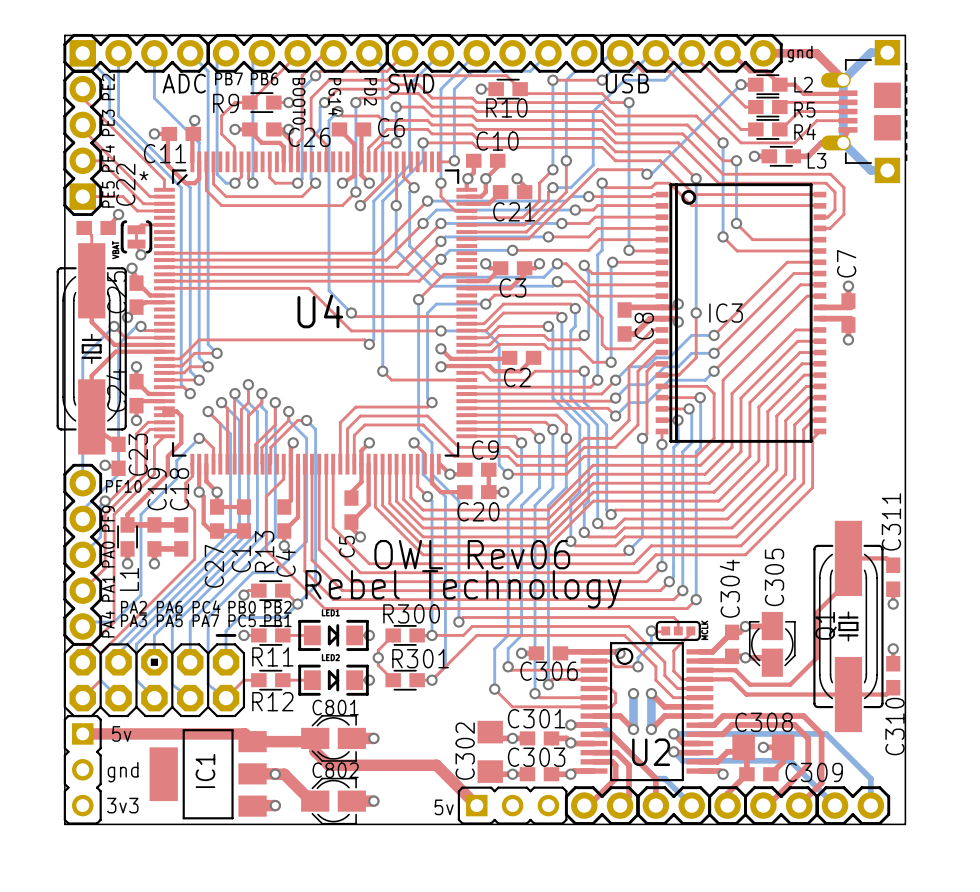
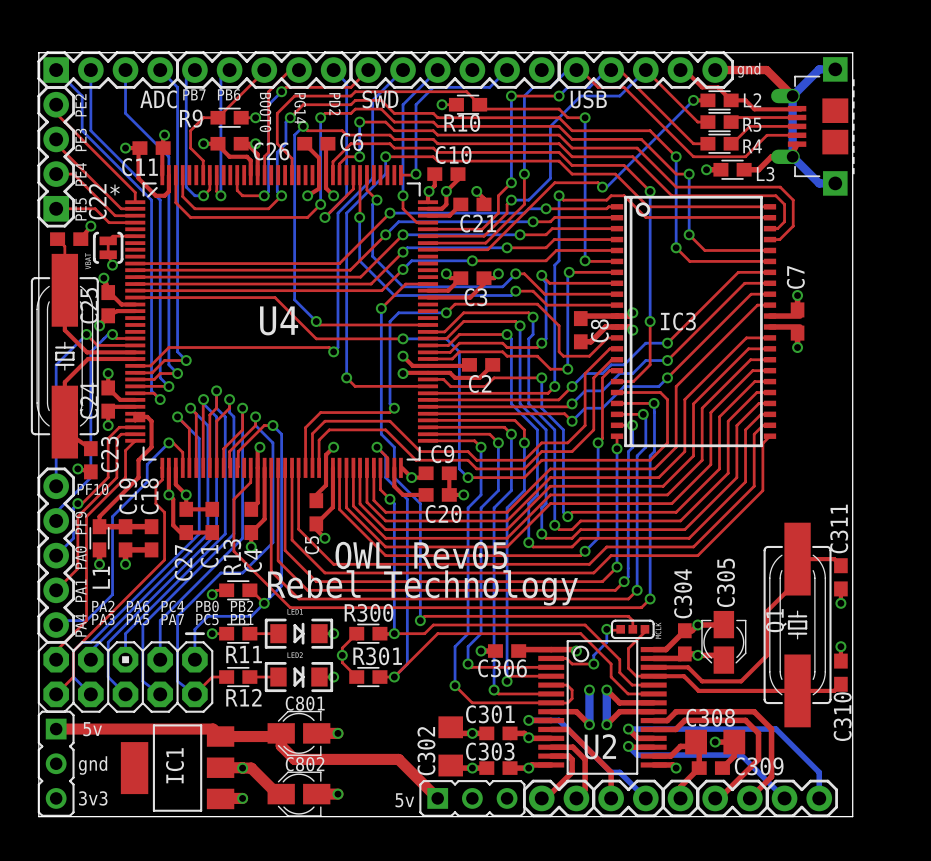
text: OWL Rev06 (472, 554) -> OWL Rev05 (421, 555)

